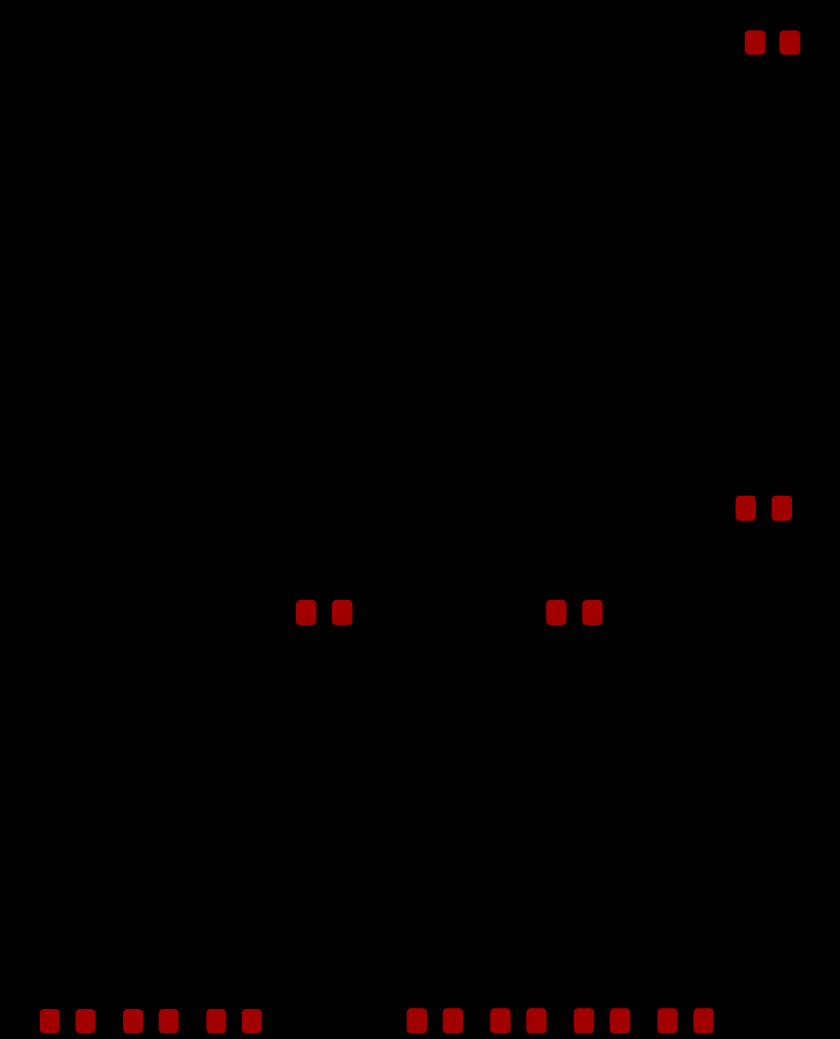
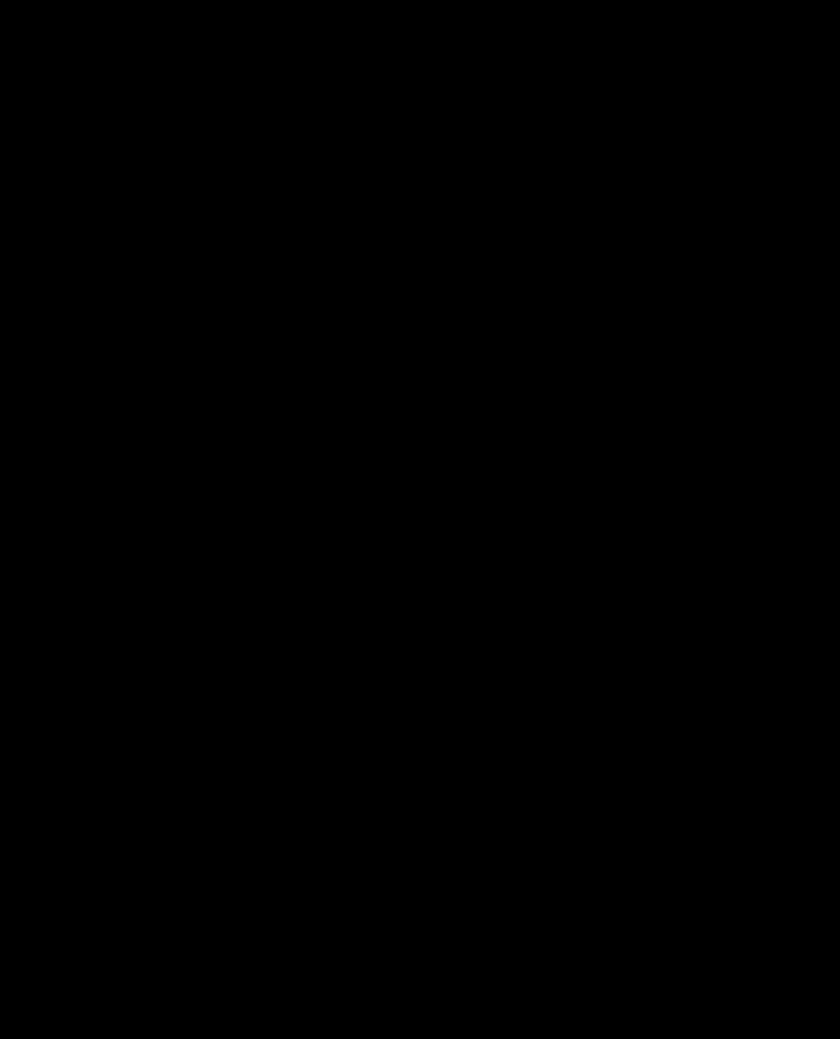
part: (772, 42) -> none
part: (763, 508) -> none
part: (324, 612) -> none
part: (574, 612) -> none
part: (434, 1020) -> none
part: (518, 1020) -> none
part: (602, 1020) -> none
part: (685, 1020) -> none
part: (67, 1021) -> none
part: (150, 1021) -> none
part: (234, 1021) -> none

